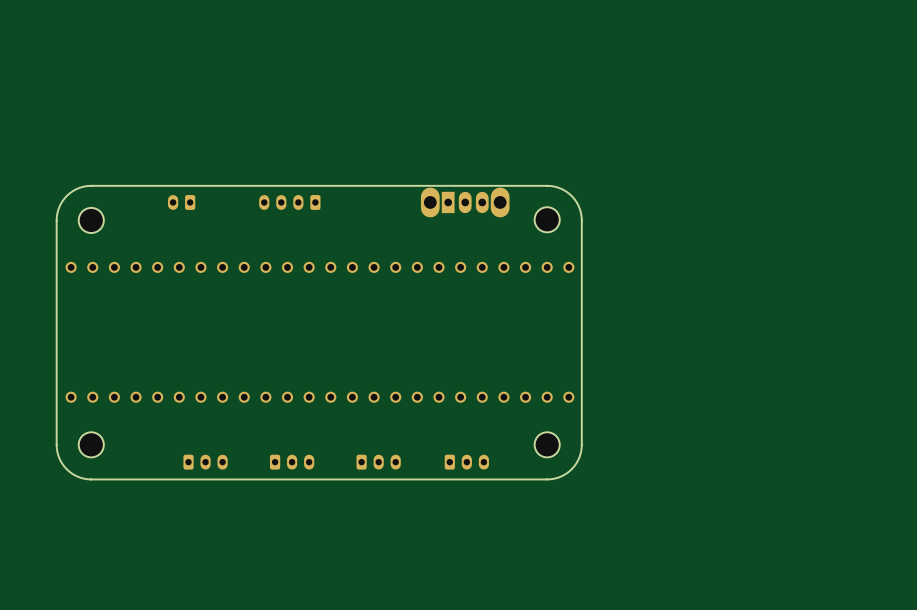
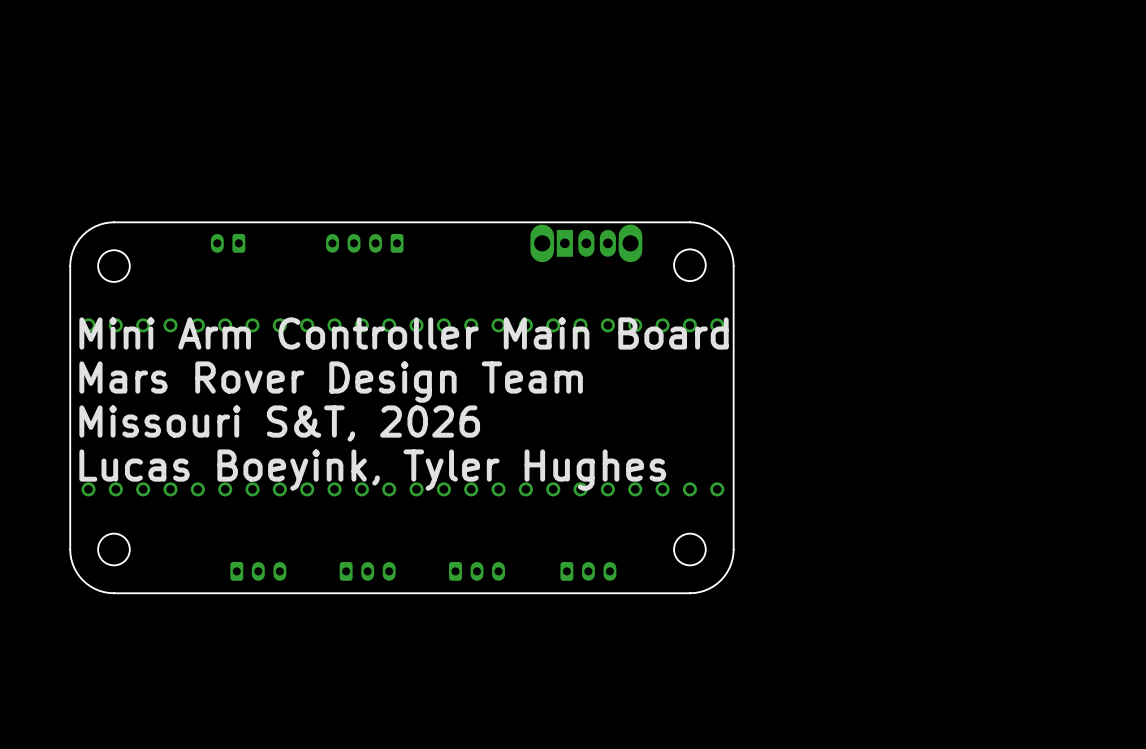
text: none -> Mini Arm Controller Main Board (404, 333)
text: none -> Mars Rover Design Team (331, 382)
text: none -> Missouri S&T, 2026 (279, 423)
text: none -> Lucas Boeyink, Tyler Hughes (372, 470)

